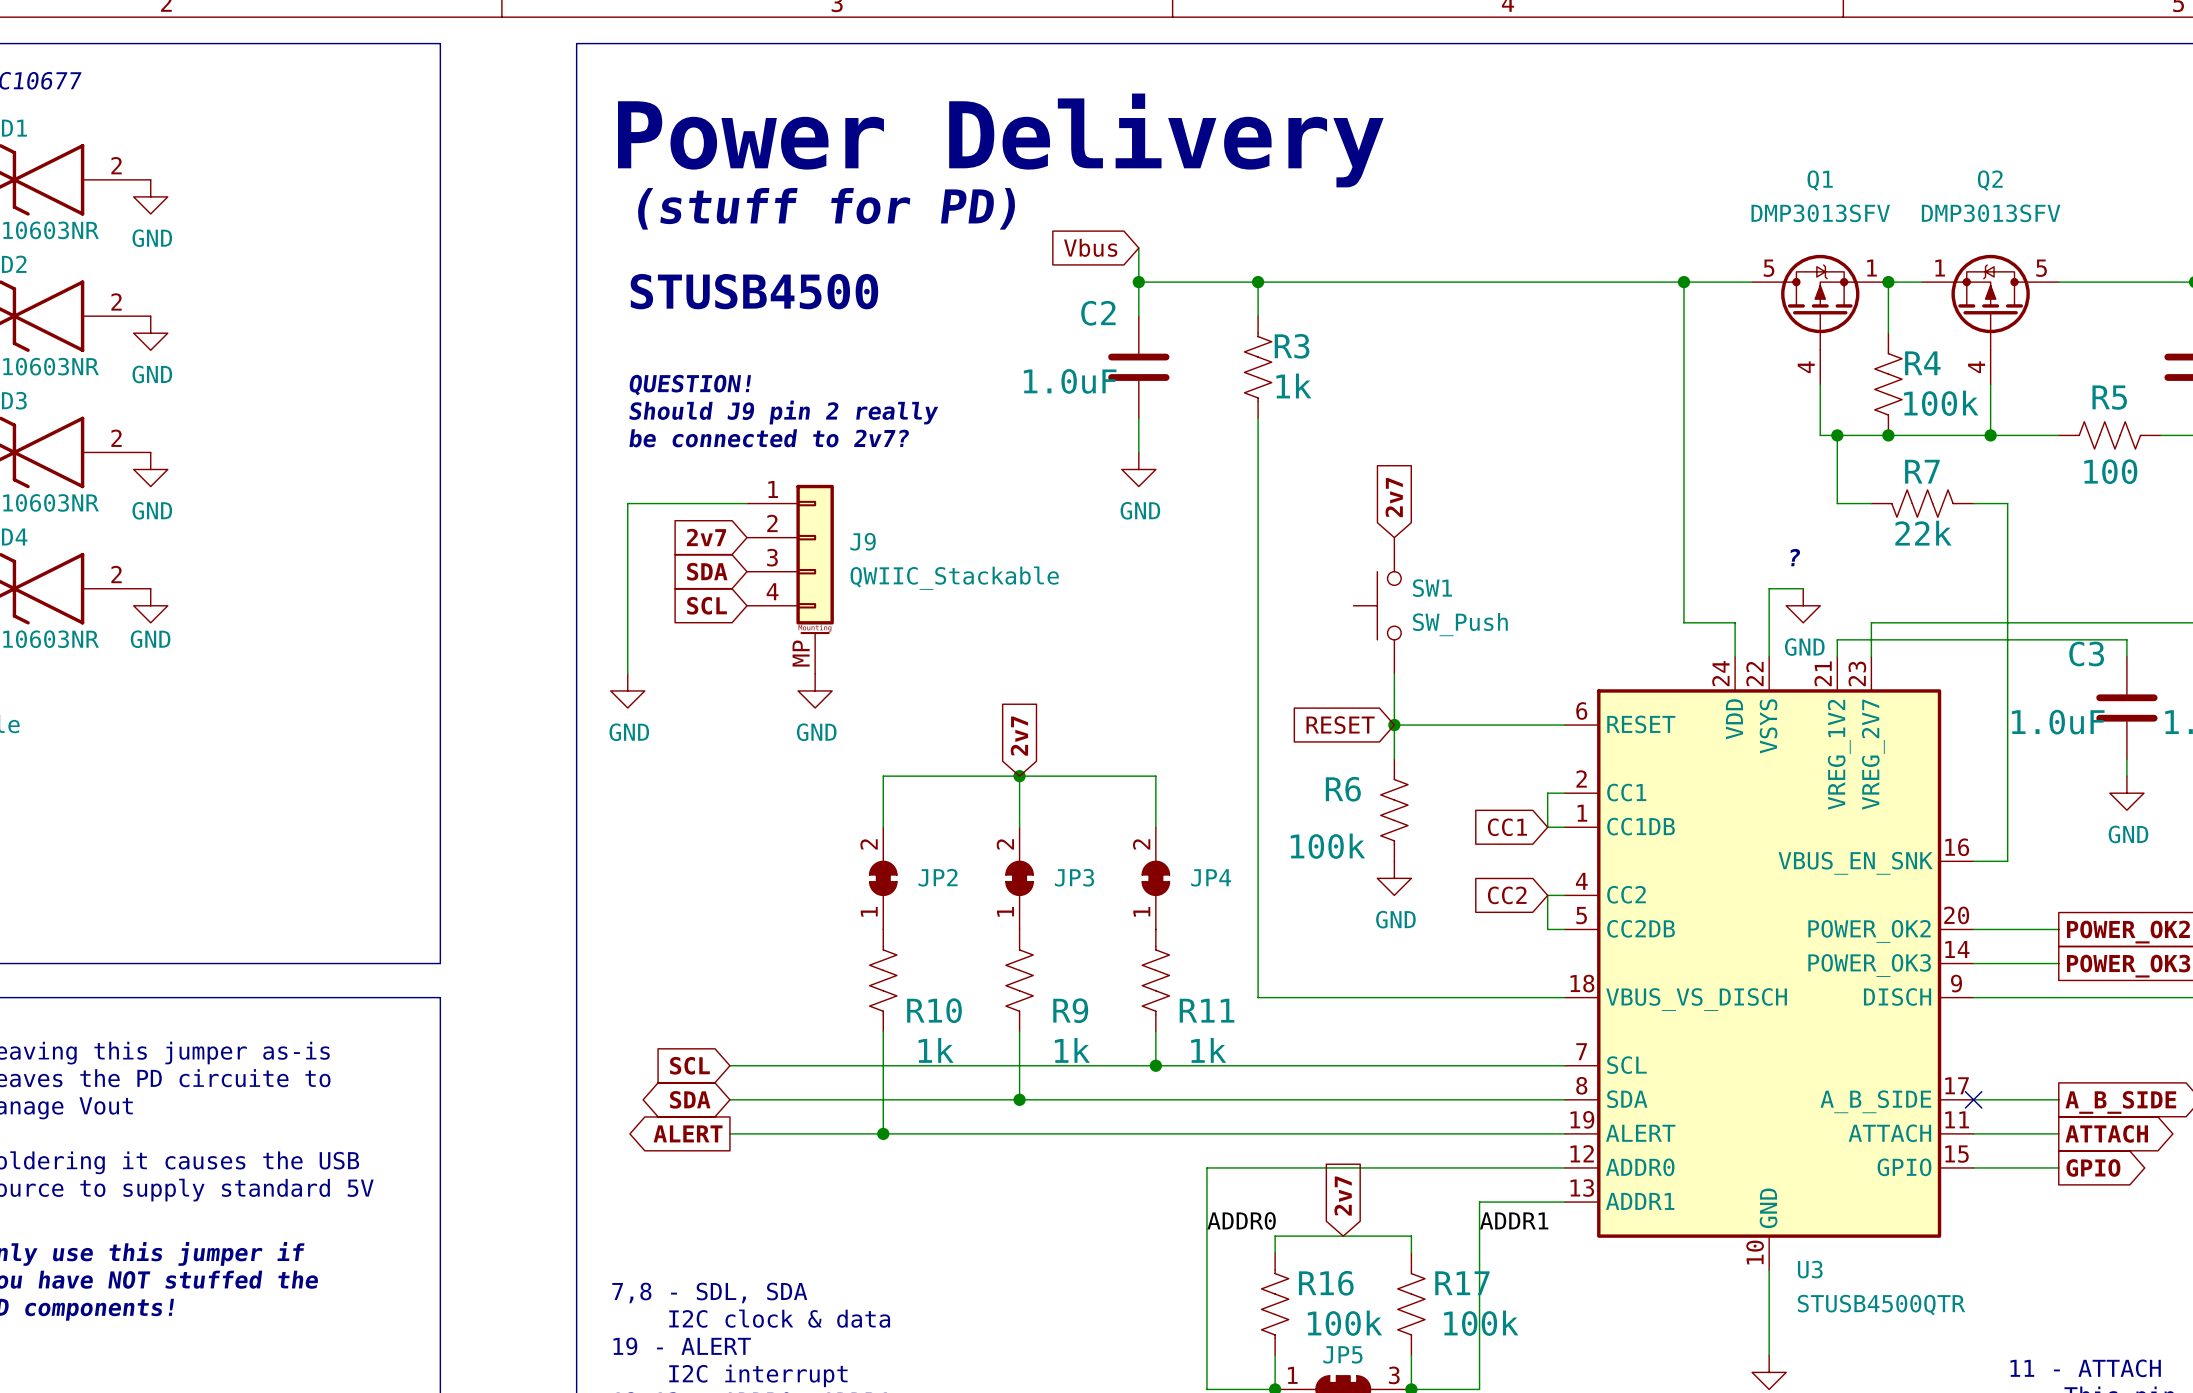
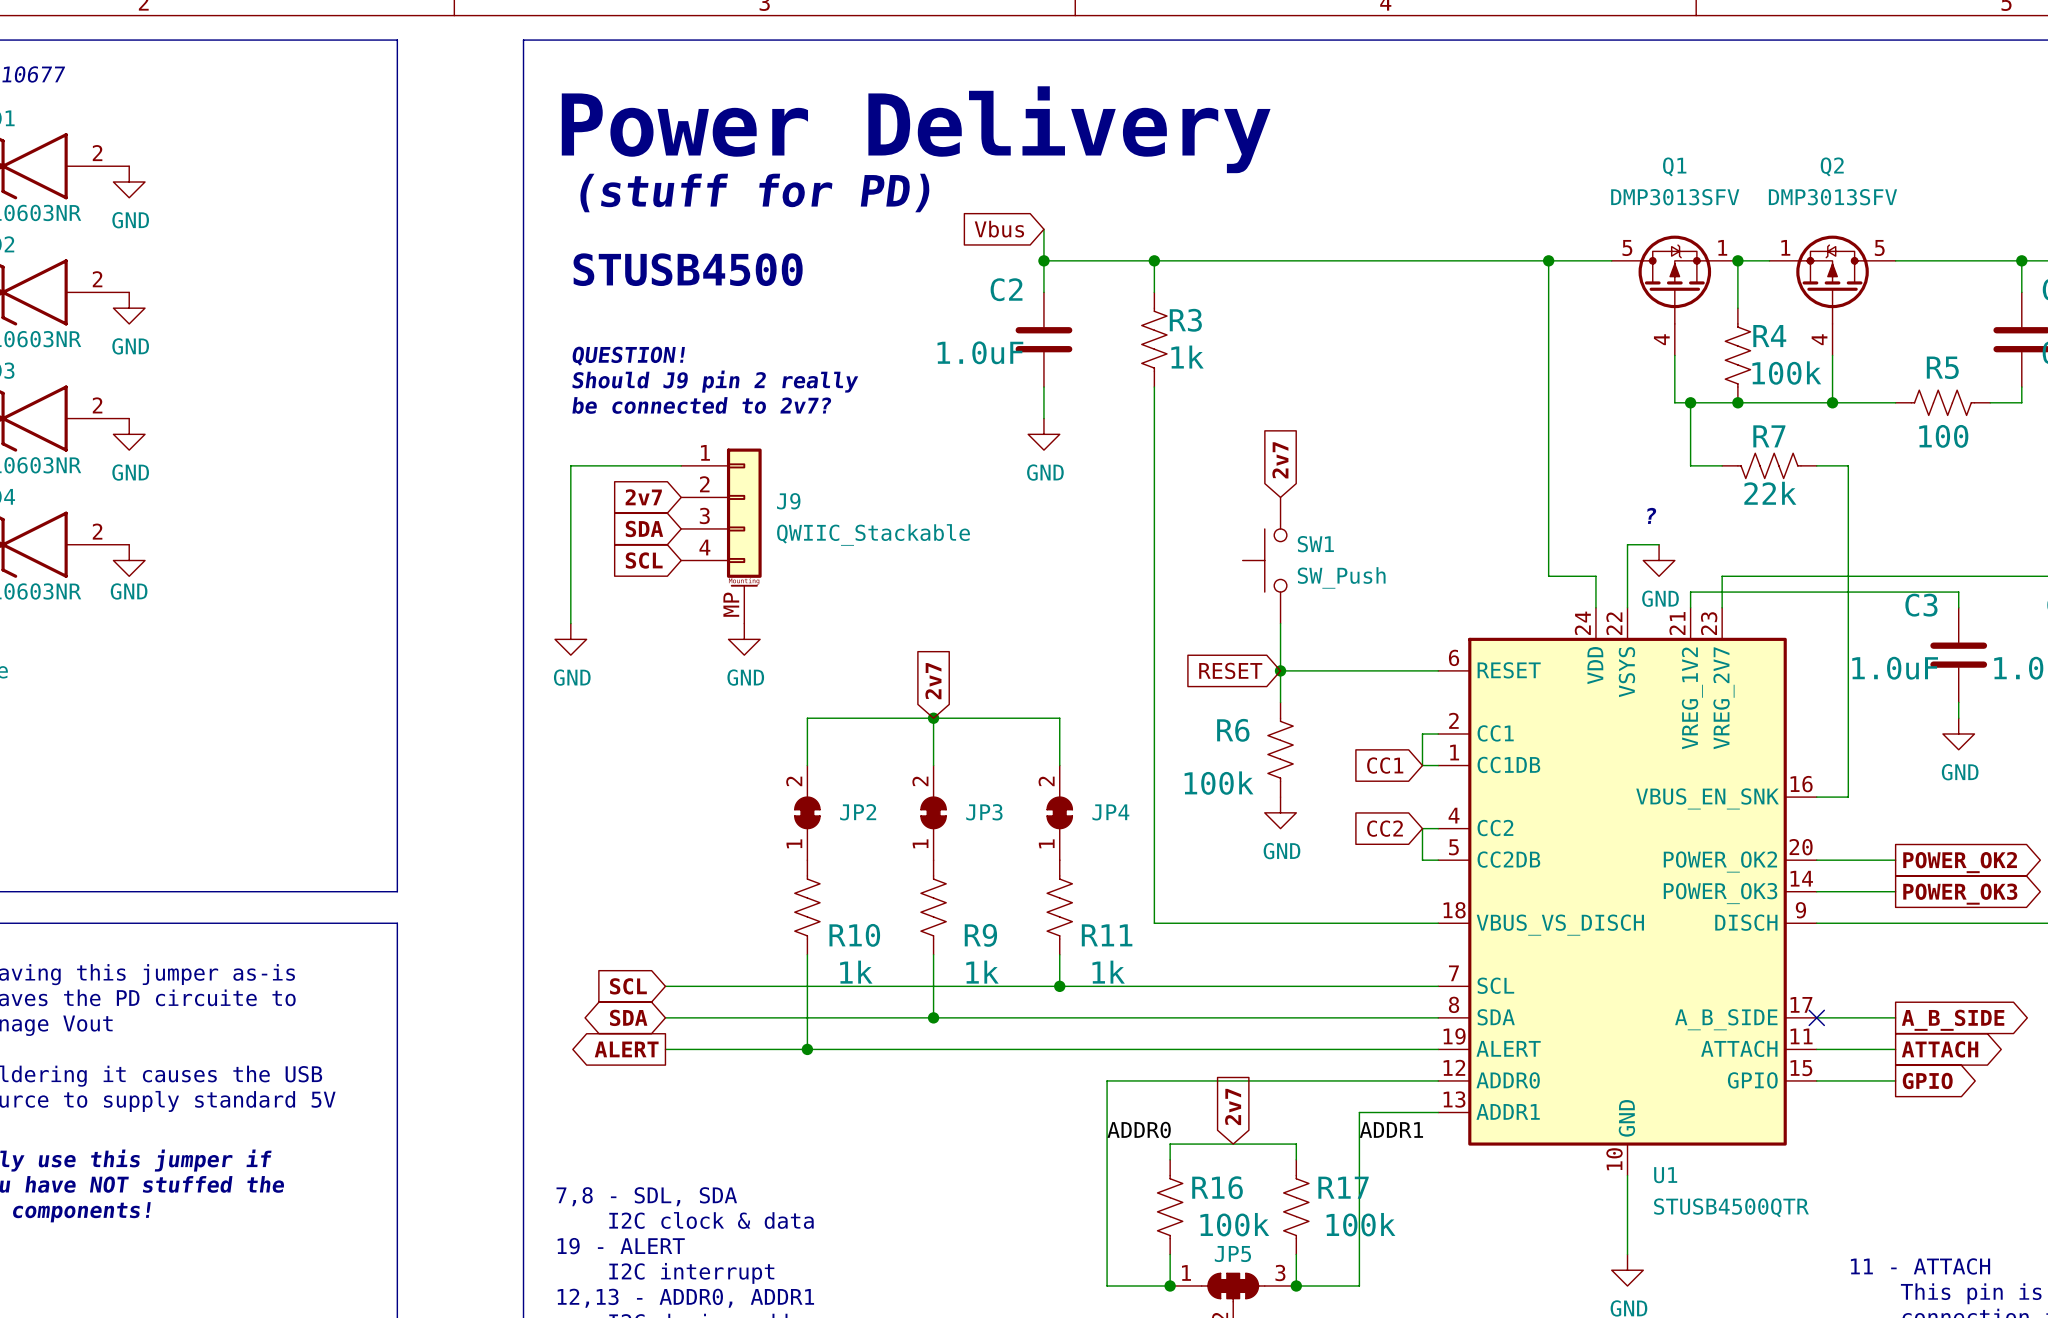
U3 name: U3 (1810, 1269) -> U1 (1665, 1175)

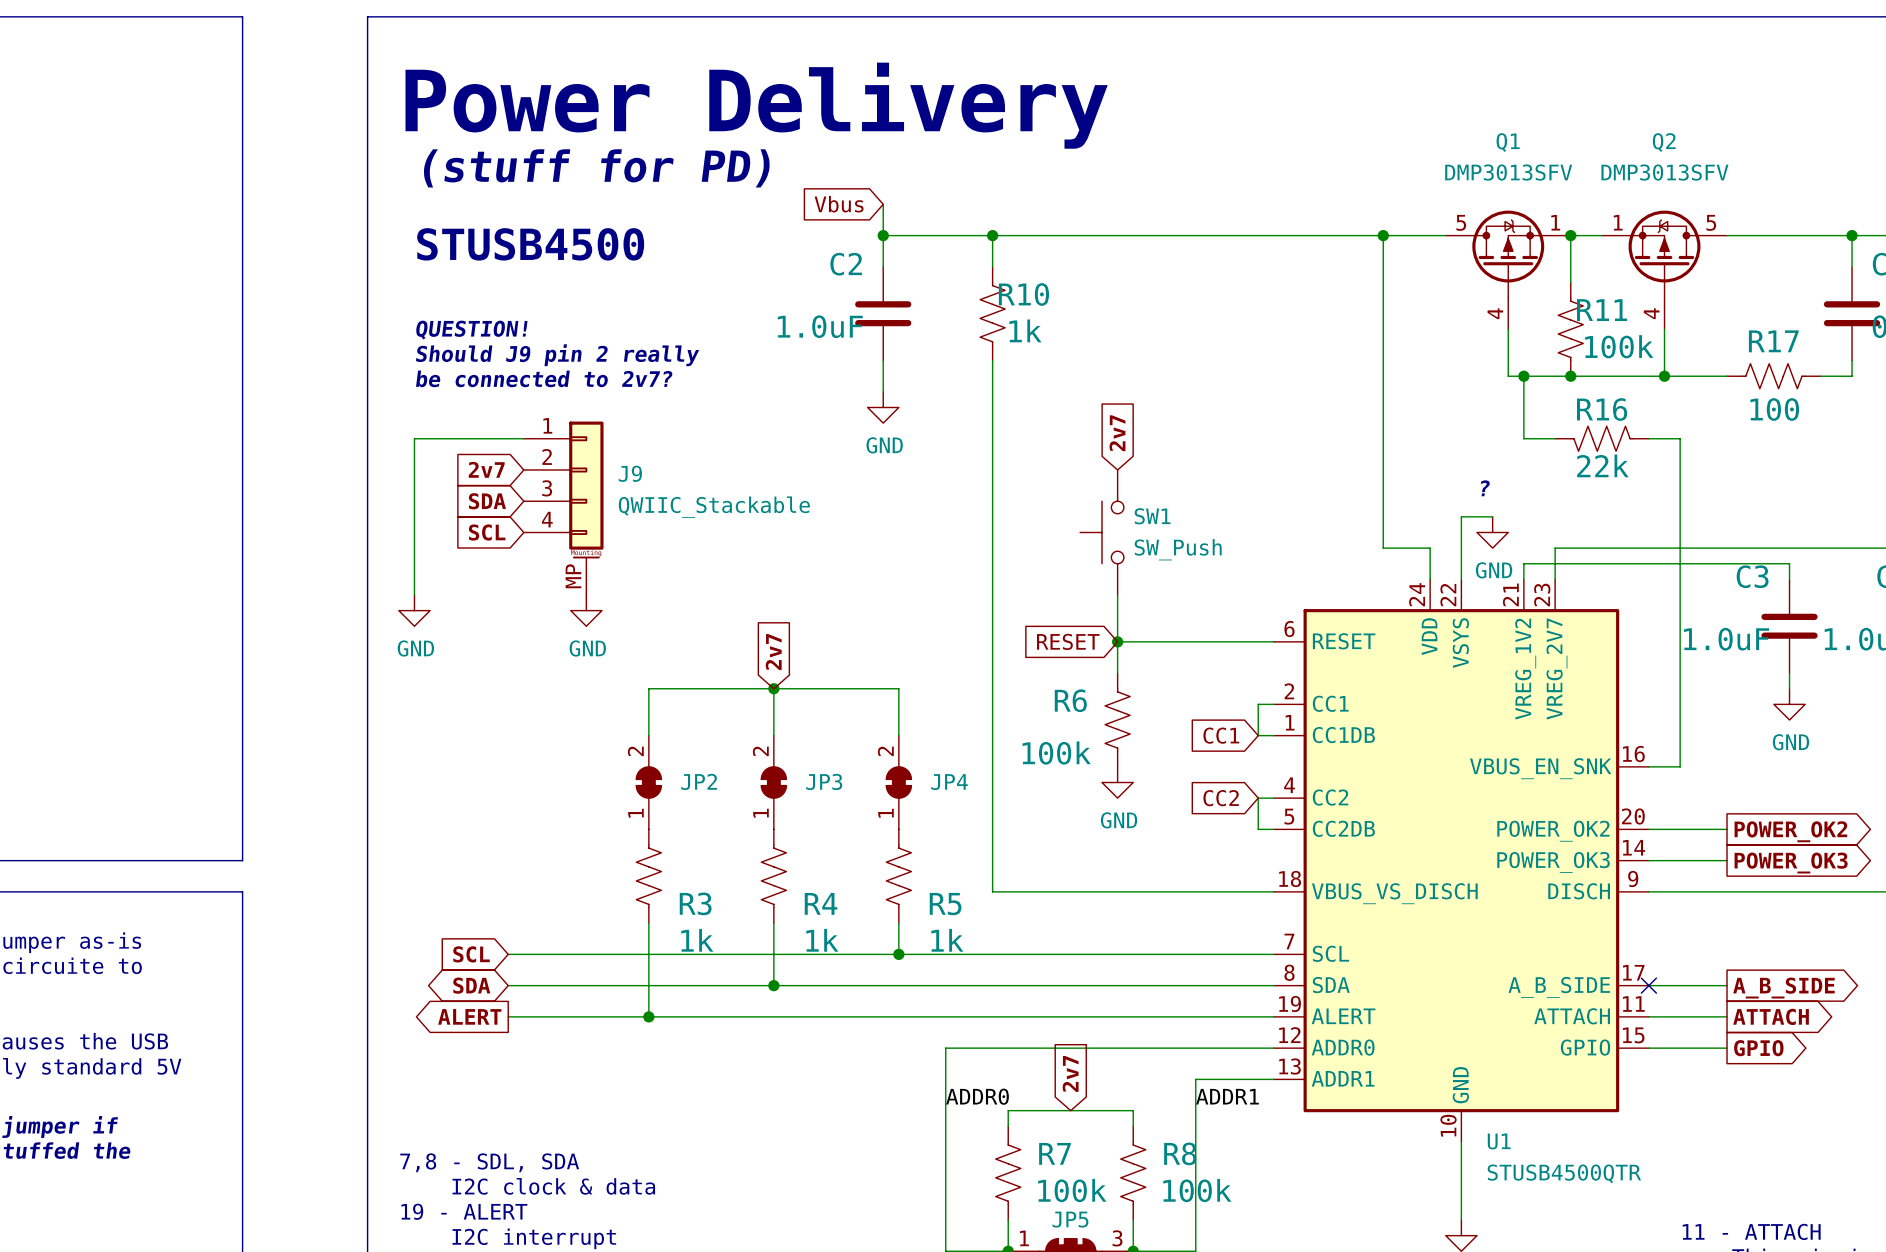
R3 name: R3 (1185, 320) -> R10 (1023, 294)
R4 name: R4 (1769, 336) -> R11 (1602, 310)
R5 name: R5 (1942, 367) -> R17 (1773, 341)
R7 name: R7 (1769, 436) -> R16 (1602, 409)
R10 name: R10 (854, 935) -> R3 (695, 903)
R9 name: R9 (980, 935) -> R4 (821, 903)
R11 name: R11 (1107, 935) -> R5 (945, 904)
R16 name: R16 (1217, 1187) -> R7 (1055, 1153)
R17 name: R17 (1343, 1187) -> R8 (1180, 1153)

